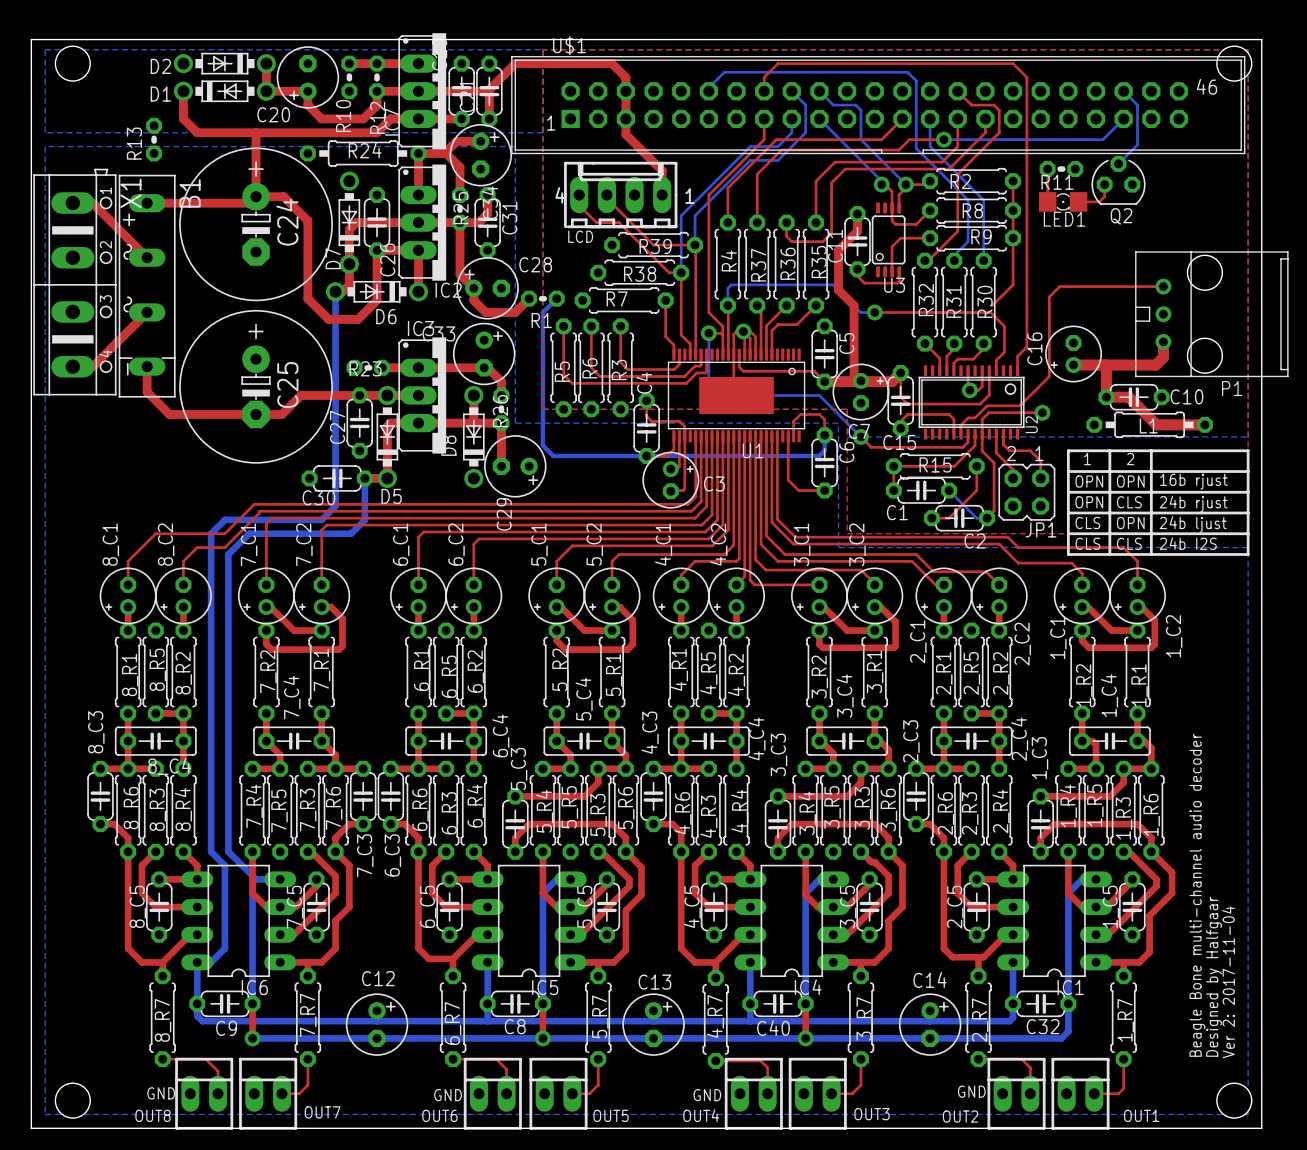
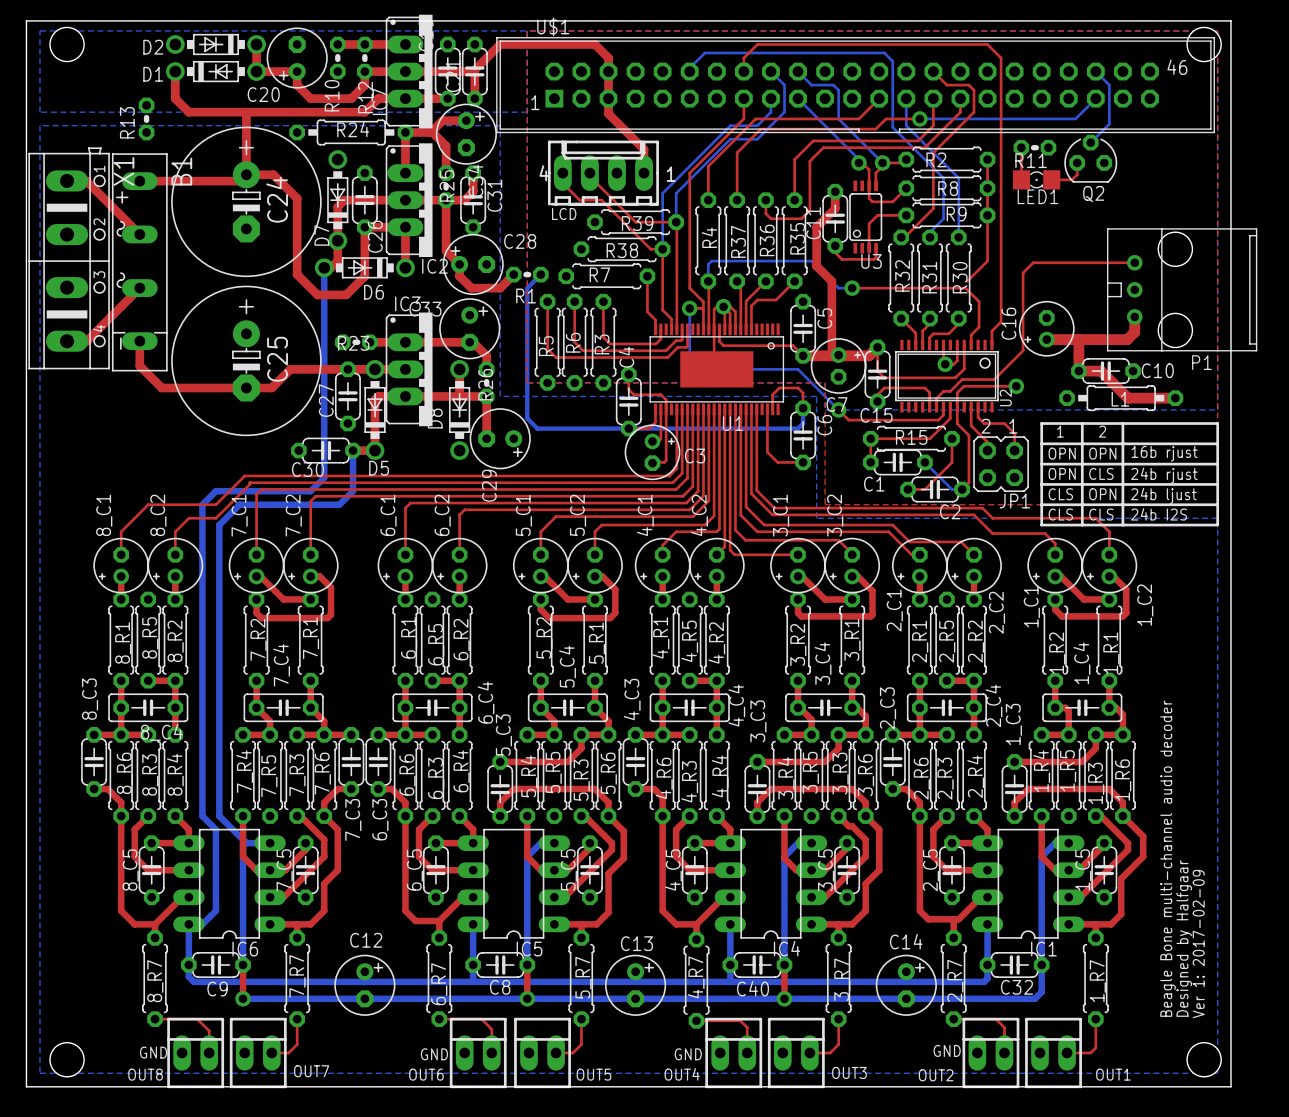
text: Ver 2: 2017-11-04 (1228, 982) -> Ver 1: 2017-02-09 (1198, 944)

